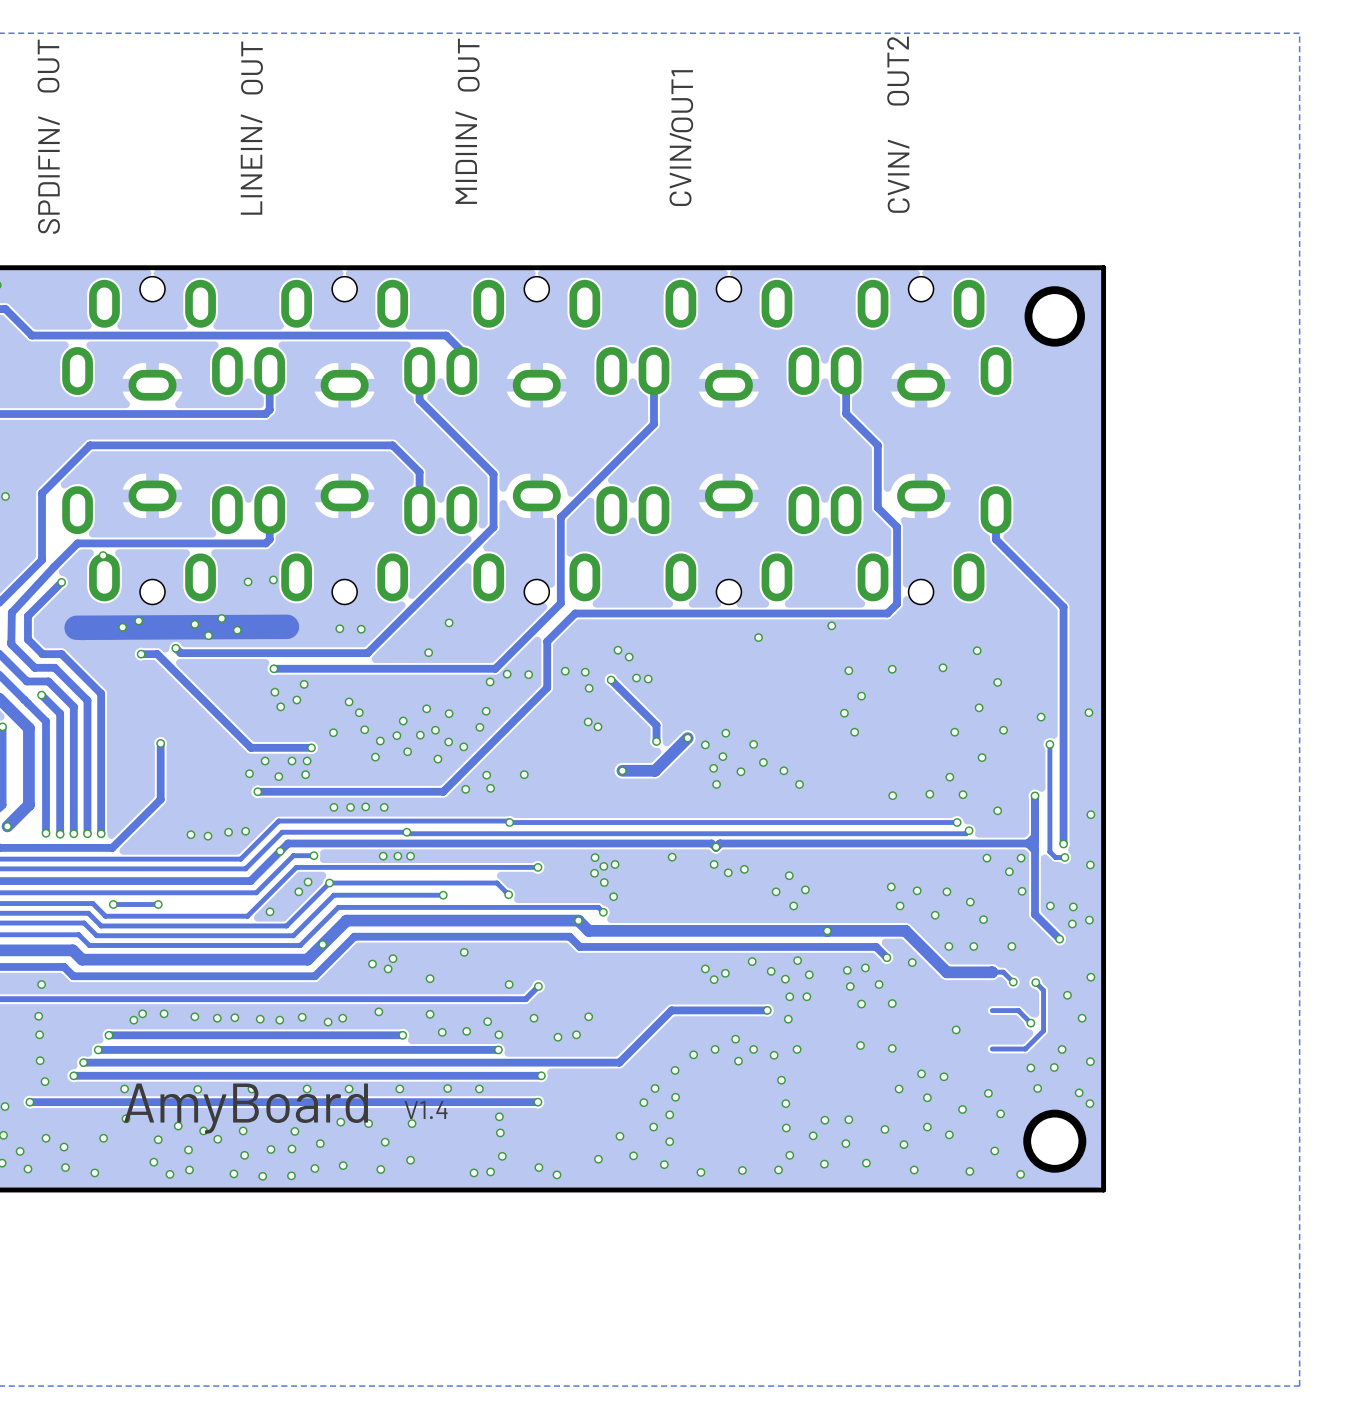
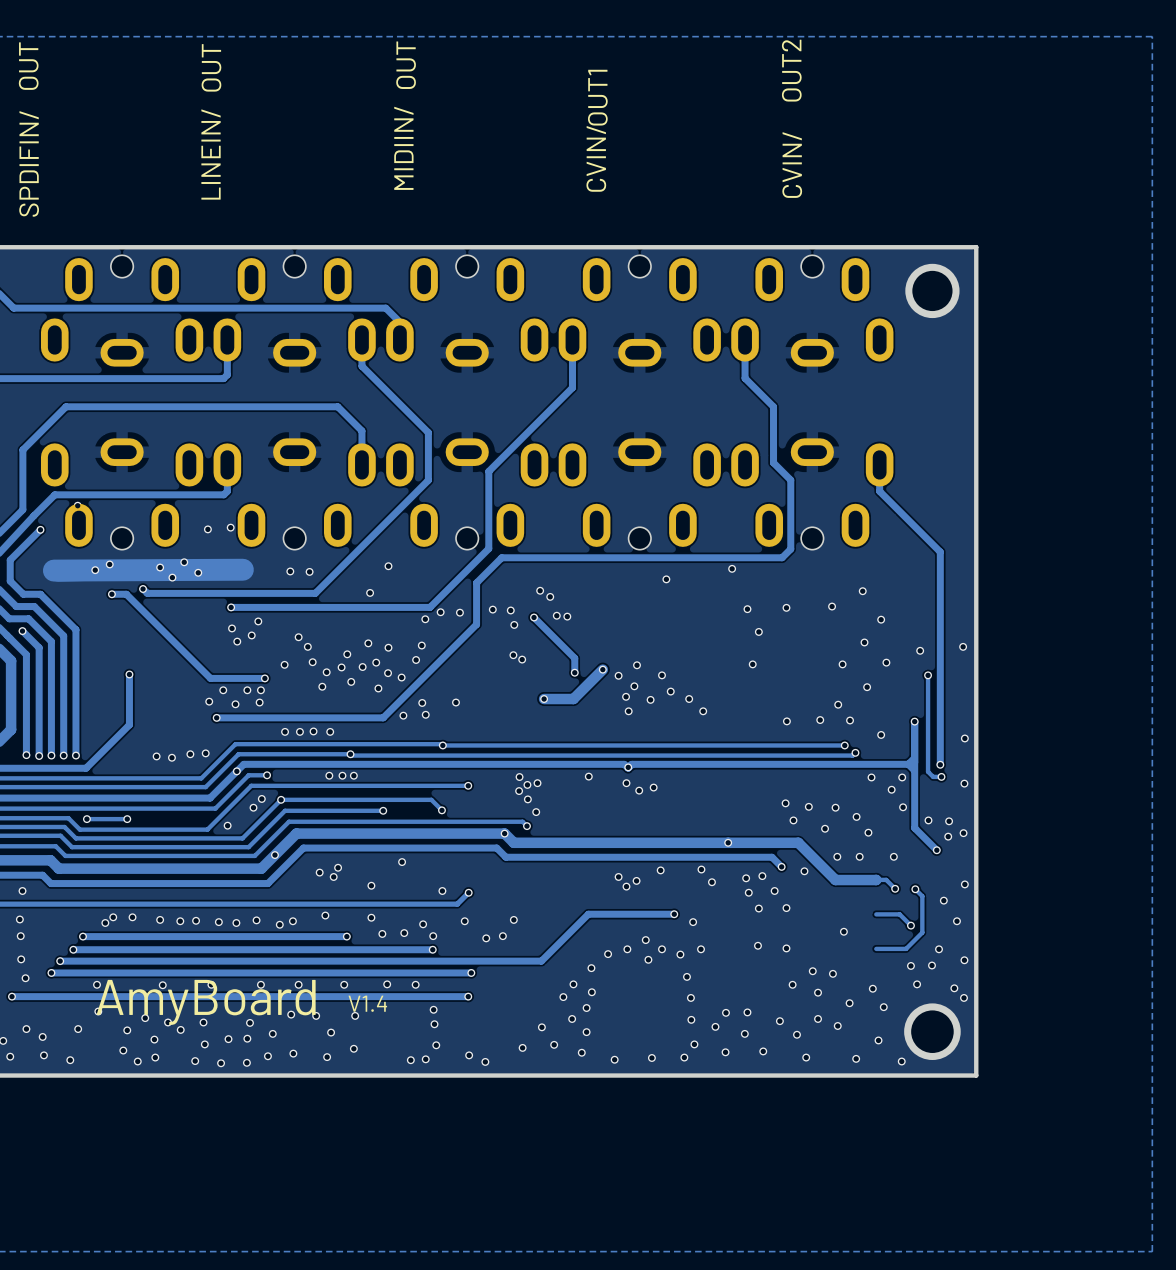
via: (844, 713) -> none
via: (789, 875) -> none
via: (805, 889) -> none
via: (776, 891) -> none
via: (793, 905) -> none
via: (771, 971) -> none
via: (785, 979) -> none
via: (789, 996) -> none
via: (806, 996) -> none

